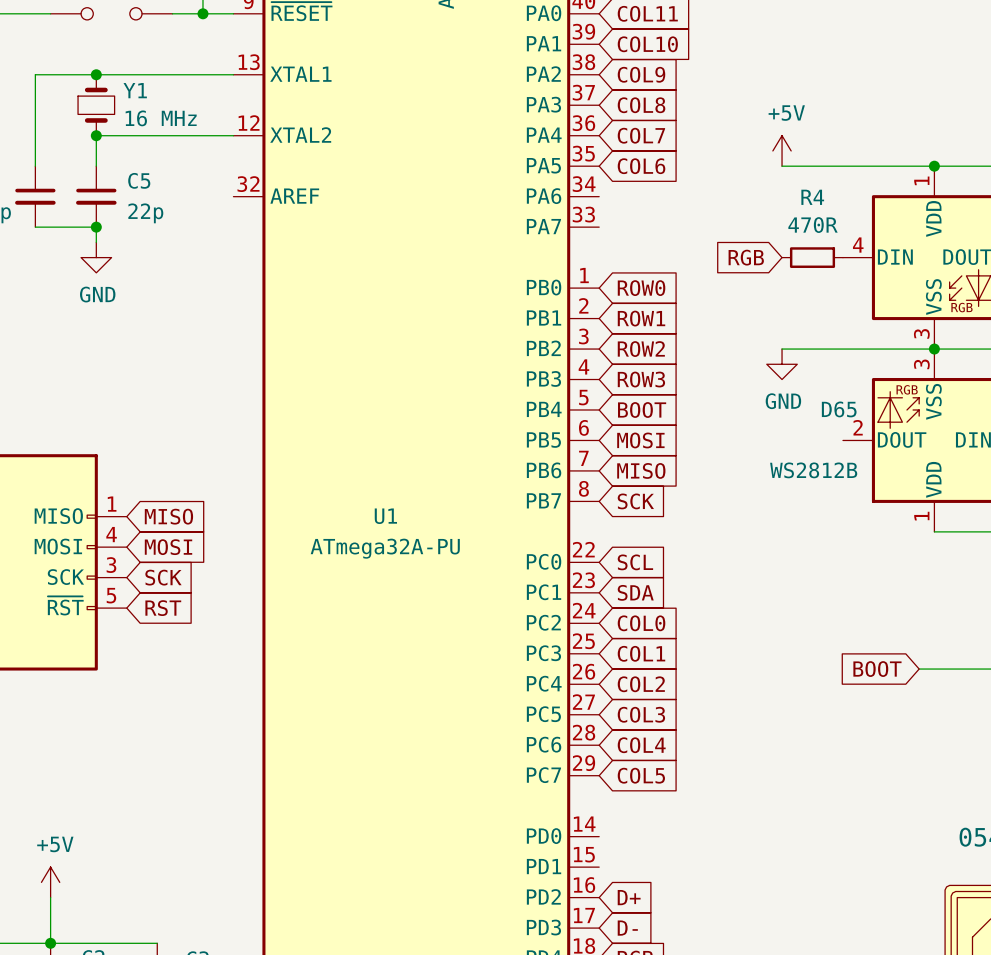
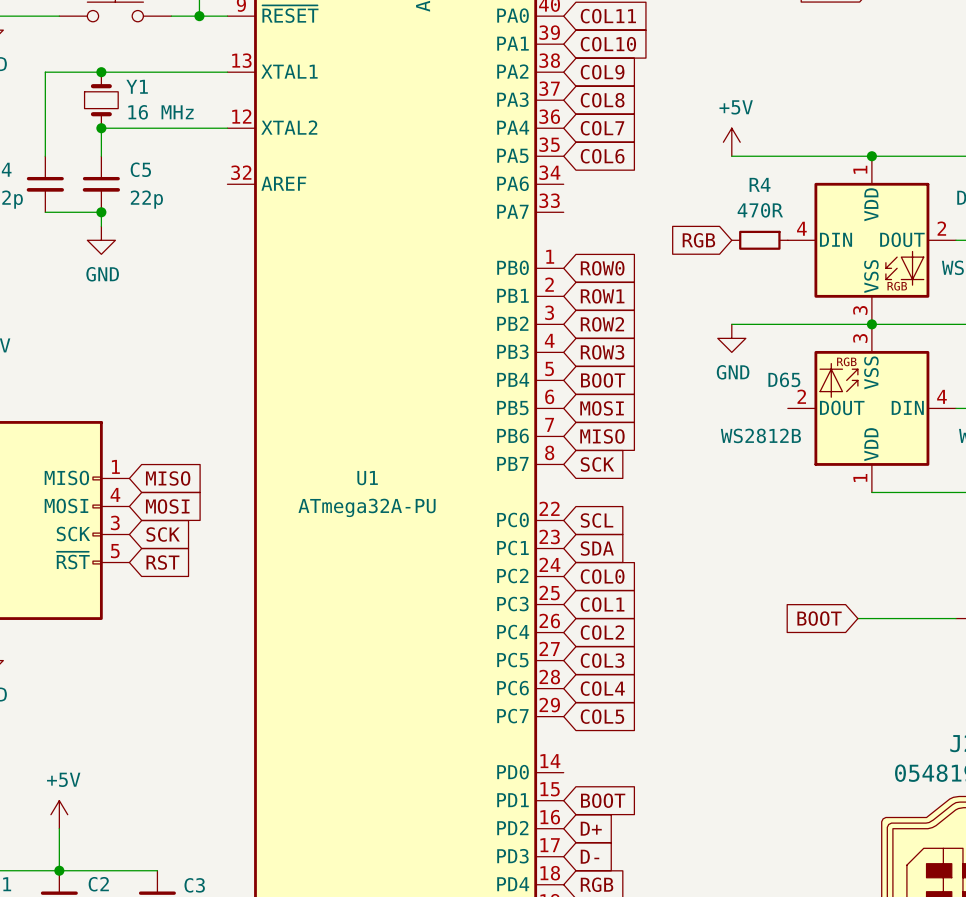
global label: none -> BOOT (603, 800)

